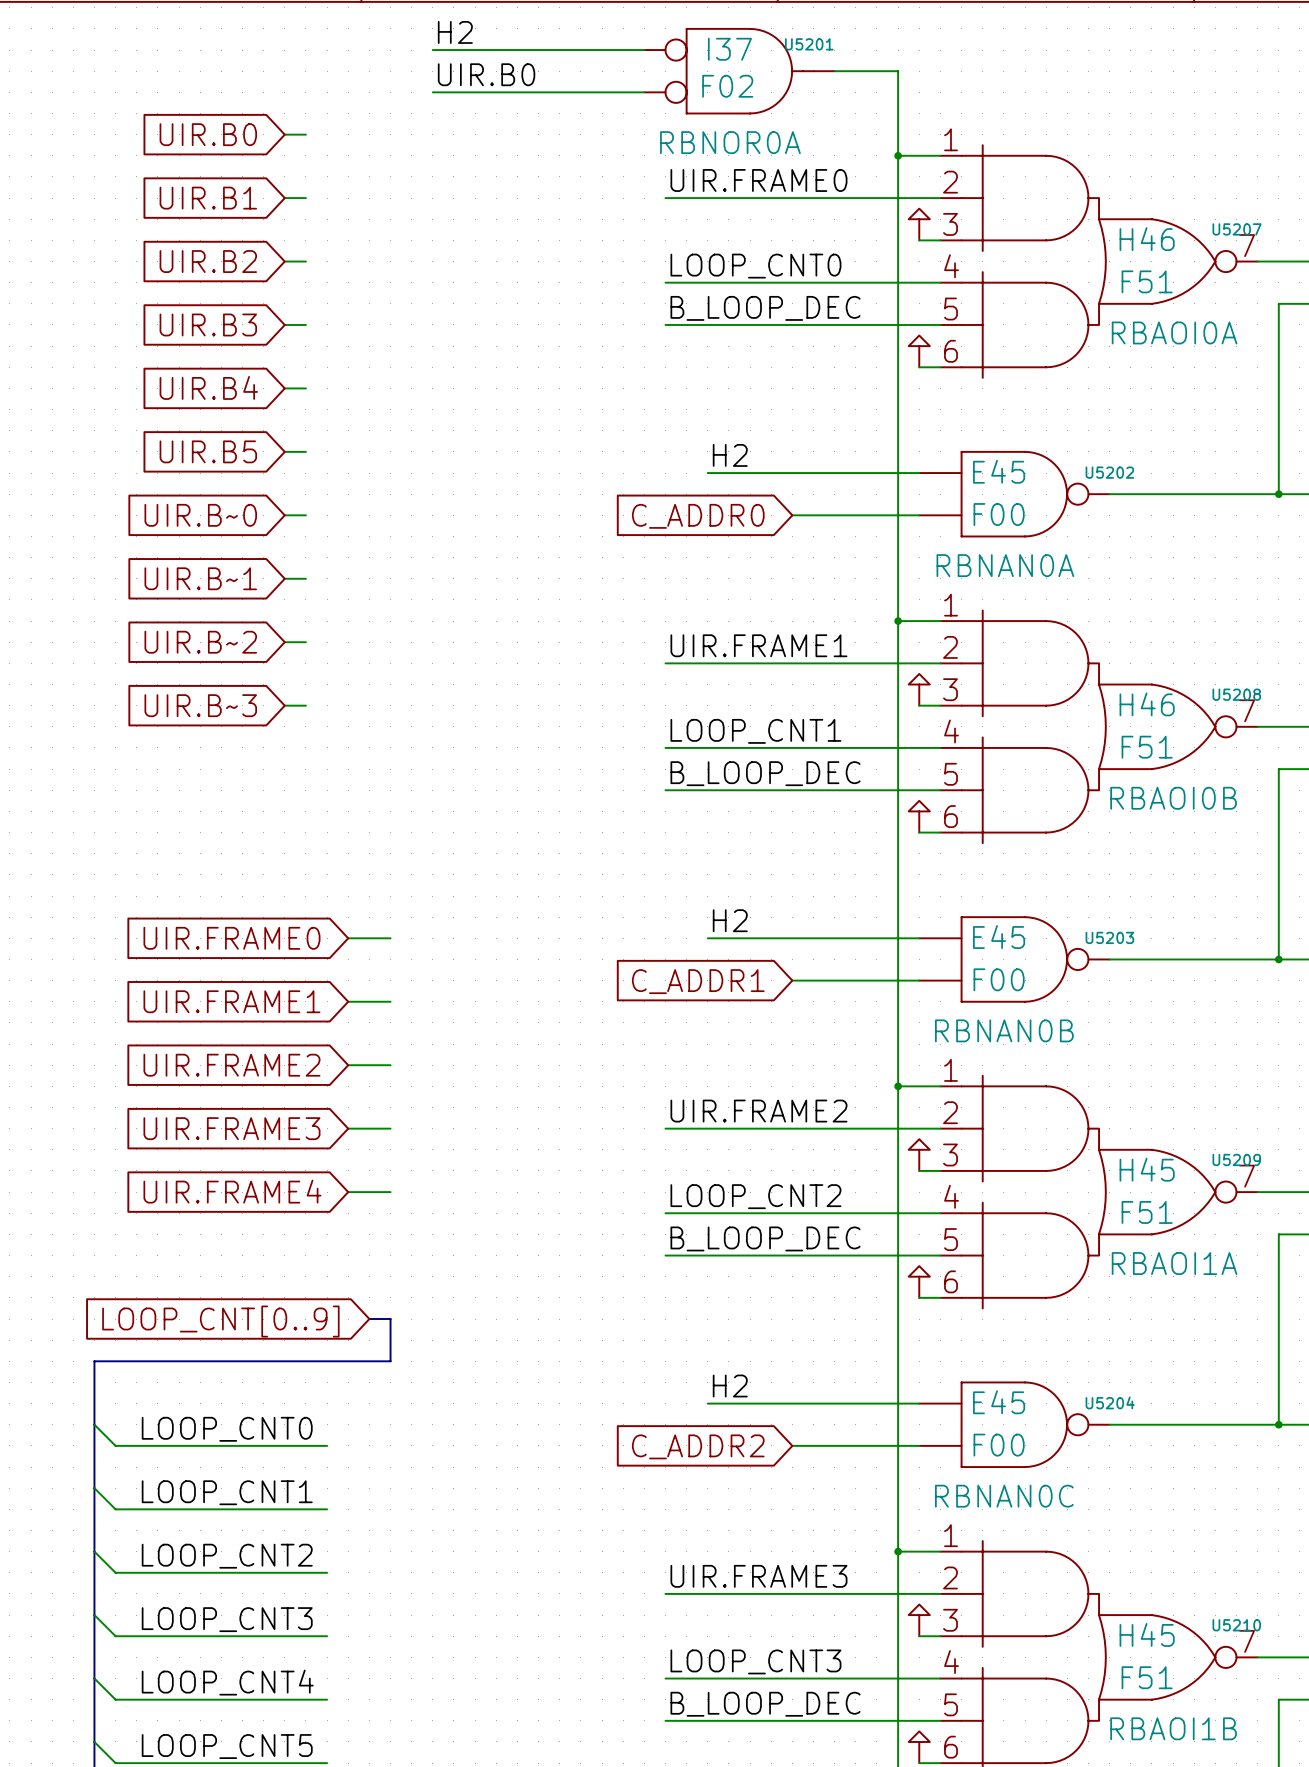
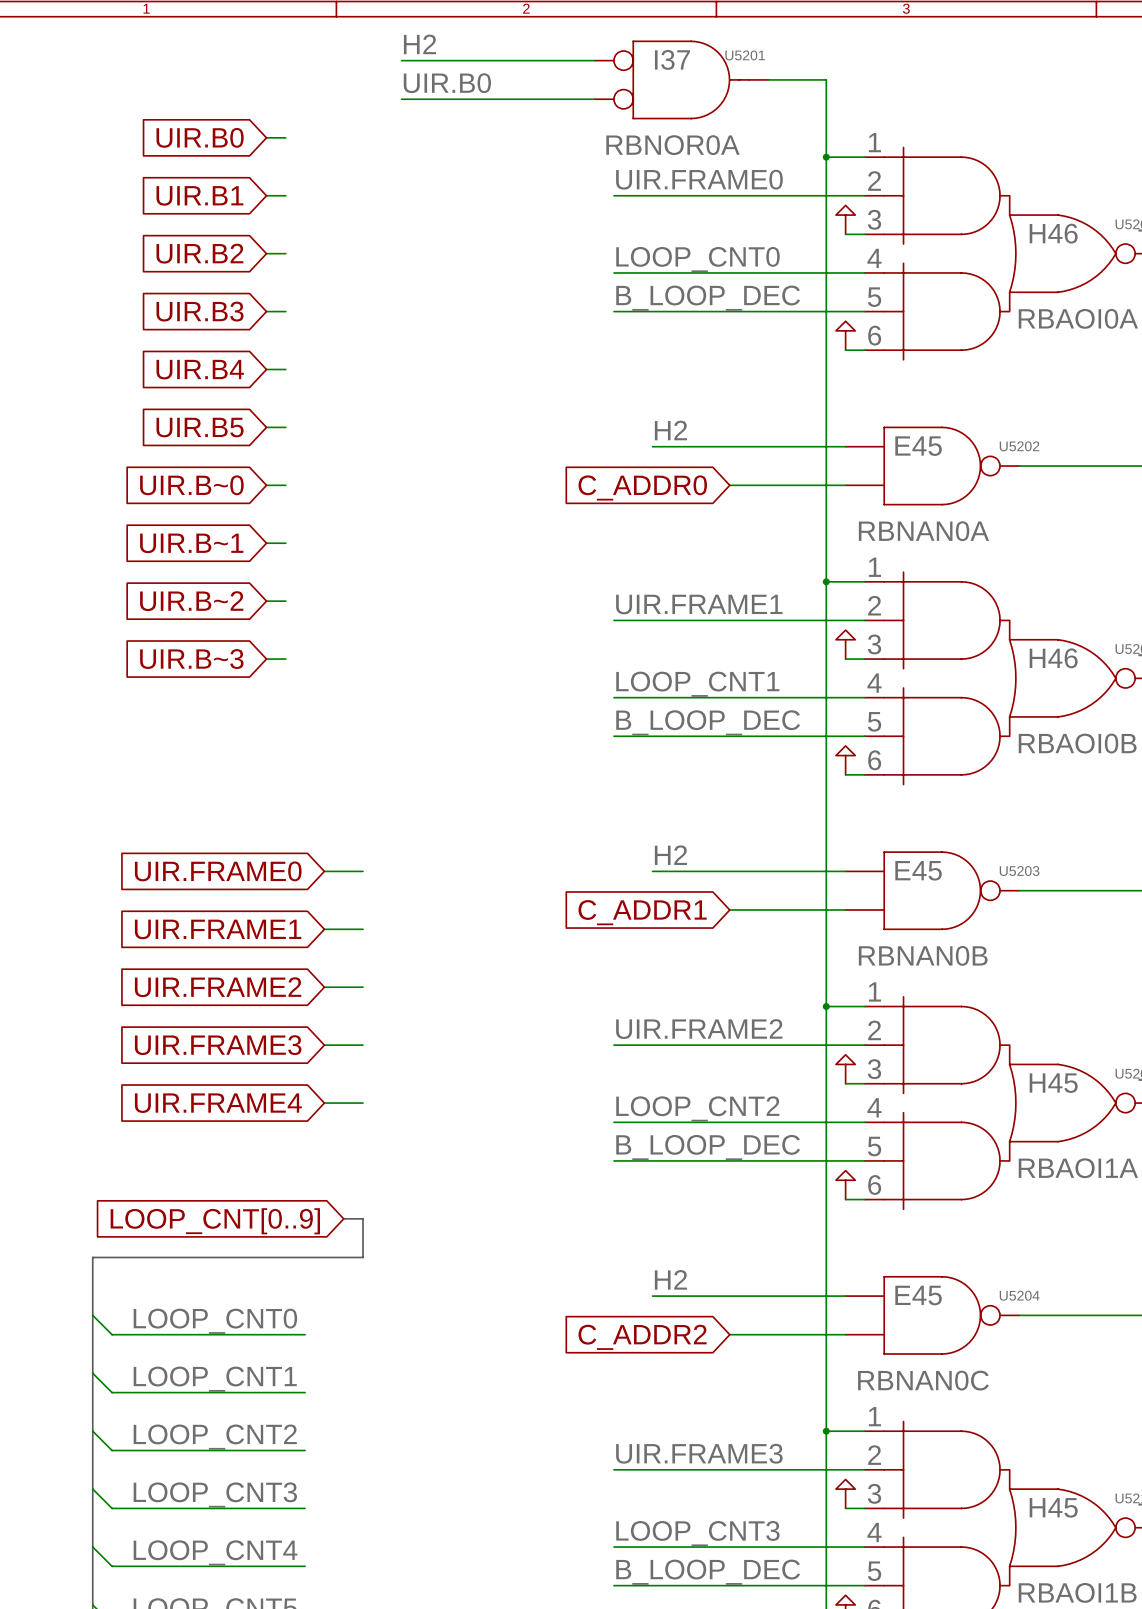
U5201 value: F02 (727, 86) -> none
U5207 value: F51 (1147, 281) -> none
U5202 value: F00 (999, 514) -> none
U5208 value: F51 (1147, 747) -> none
U5203 value: F00 (999, 979) -> none
U5209 value: F51 (1147, 1212) -> none
U5204 value: F00 (999, 1445) -> none
U5210 value: F51 (1147, 1677) -> none

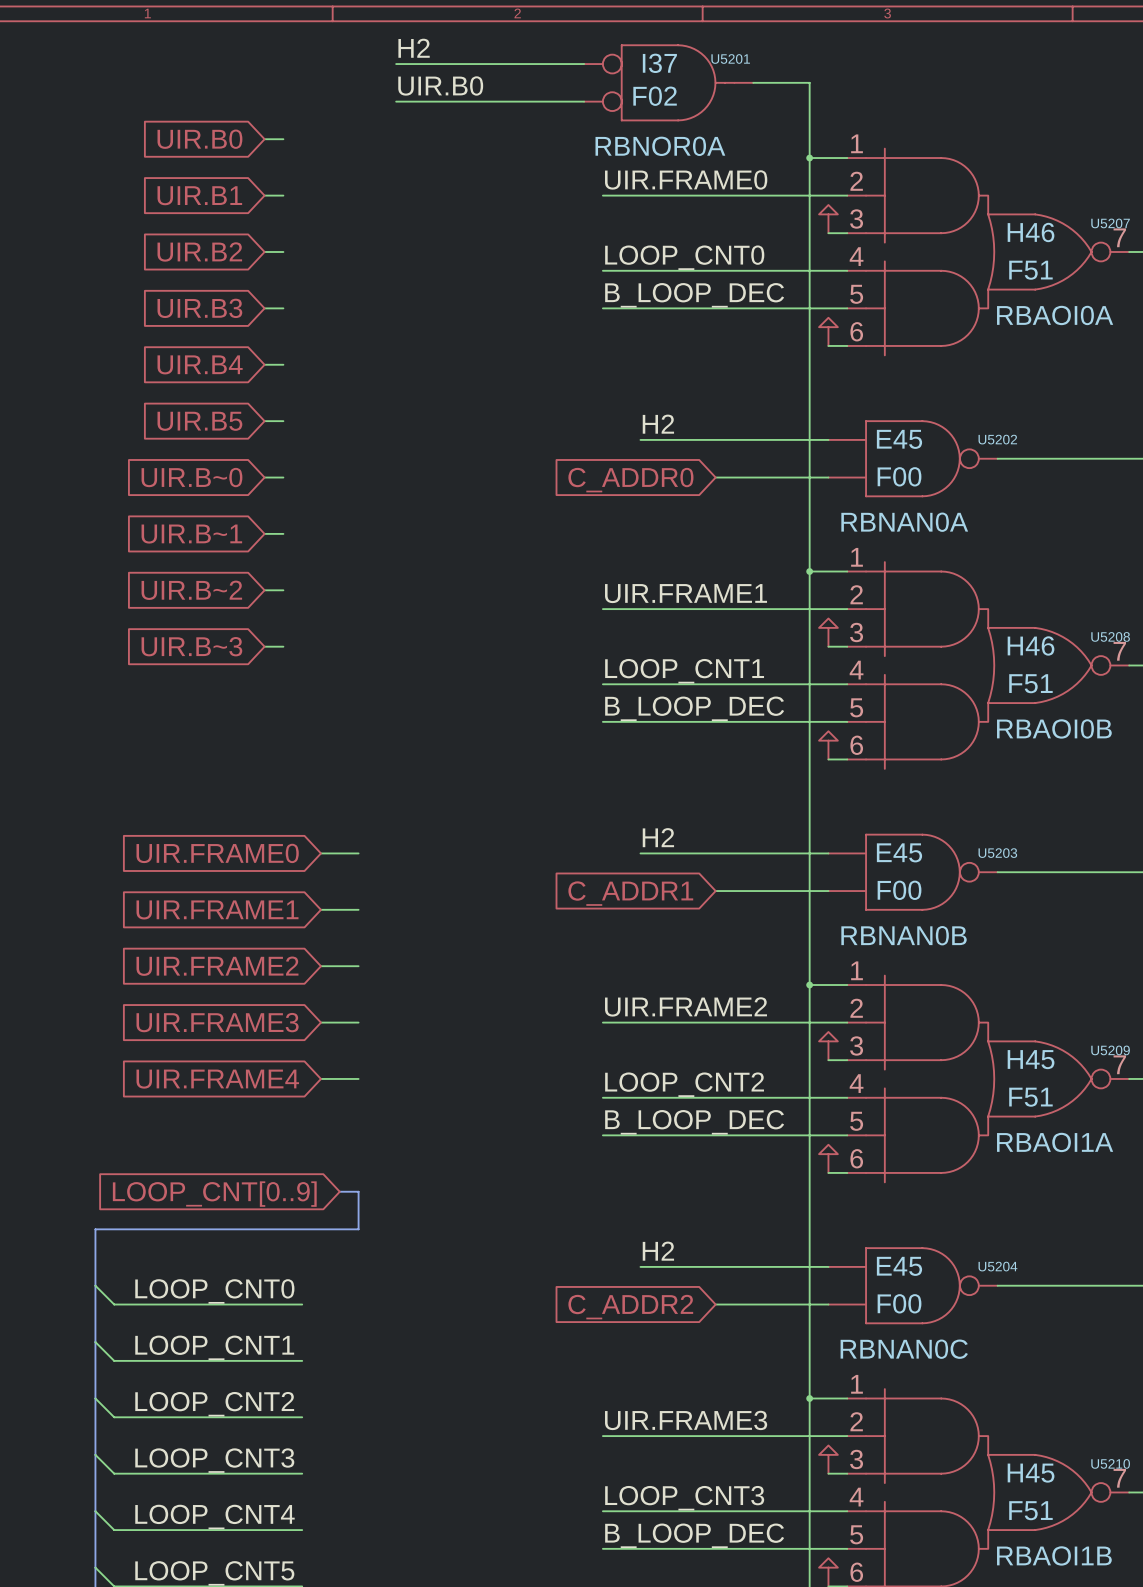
U5201 value: none -> F02 (655, 96)
U5207 value: none -> F51 (1030, 270)
U5202 value: none -> F00 (899, 476)
U5208 value: none -> F51 (1030, 683)
U5203 value: none -> F00 (899, 890)
U5209 value: none -> F51 (1030, 1097)
U5204 value: none -> F00 (899, 1303)
U5210 value: none -> F51 (1030, 1510)

